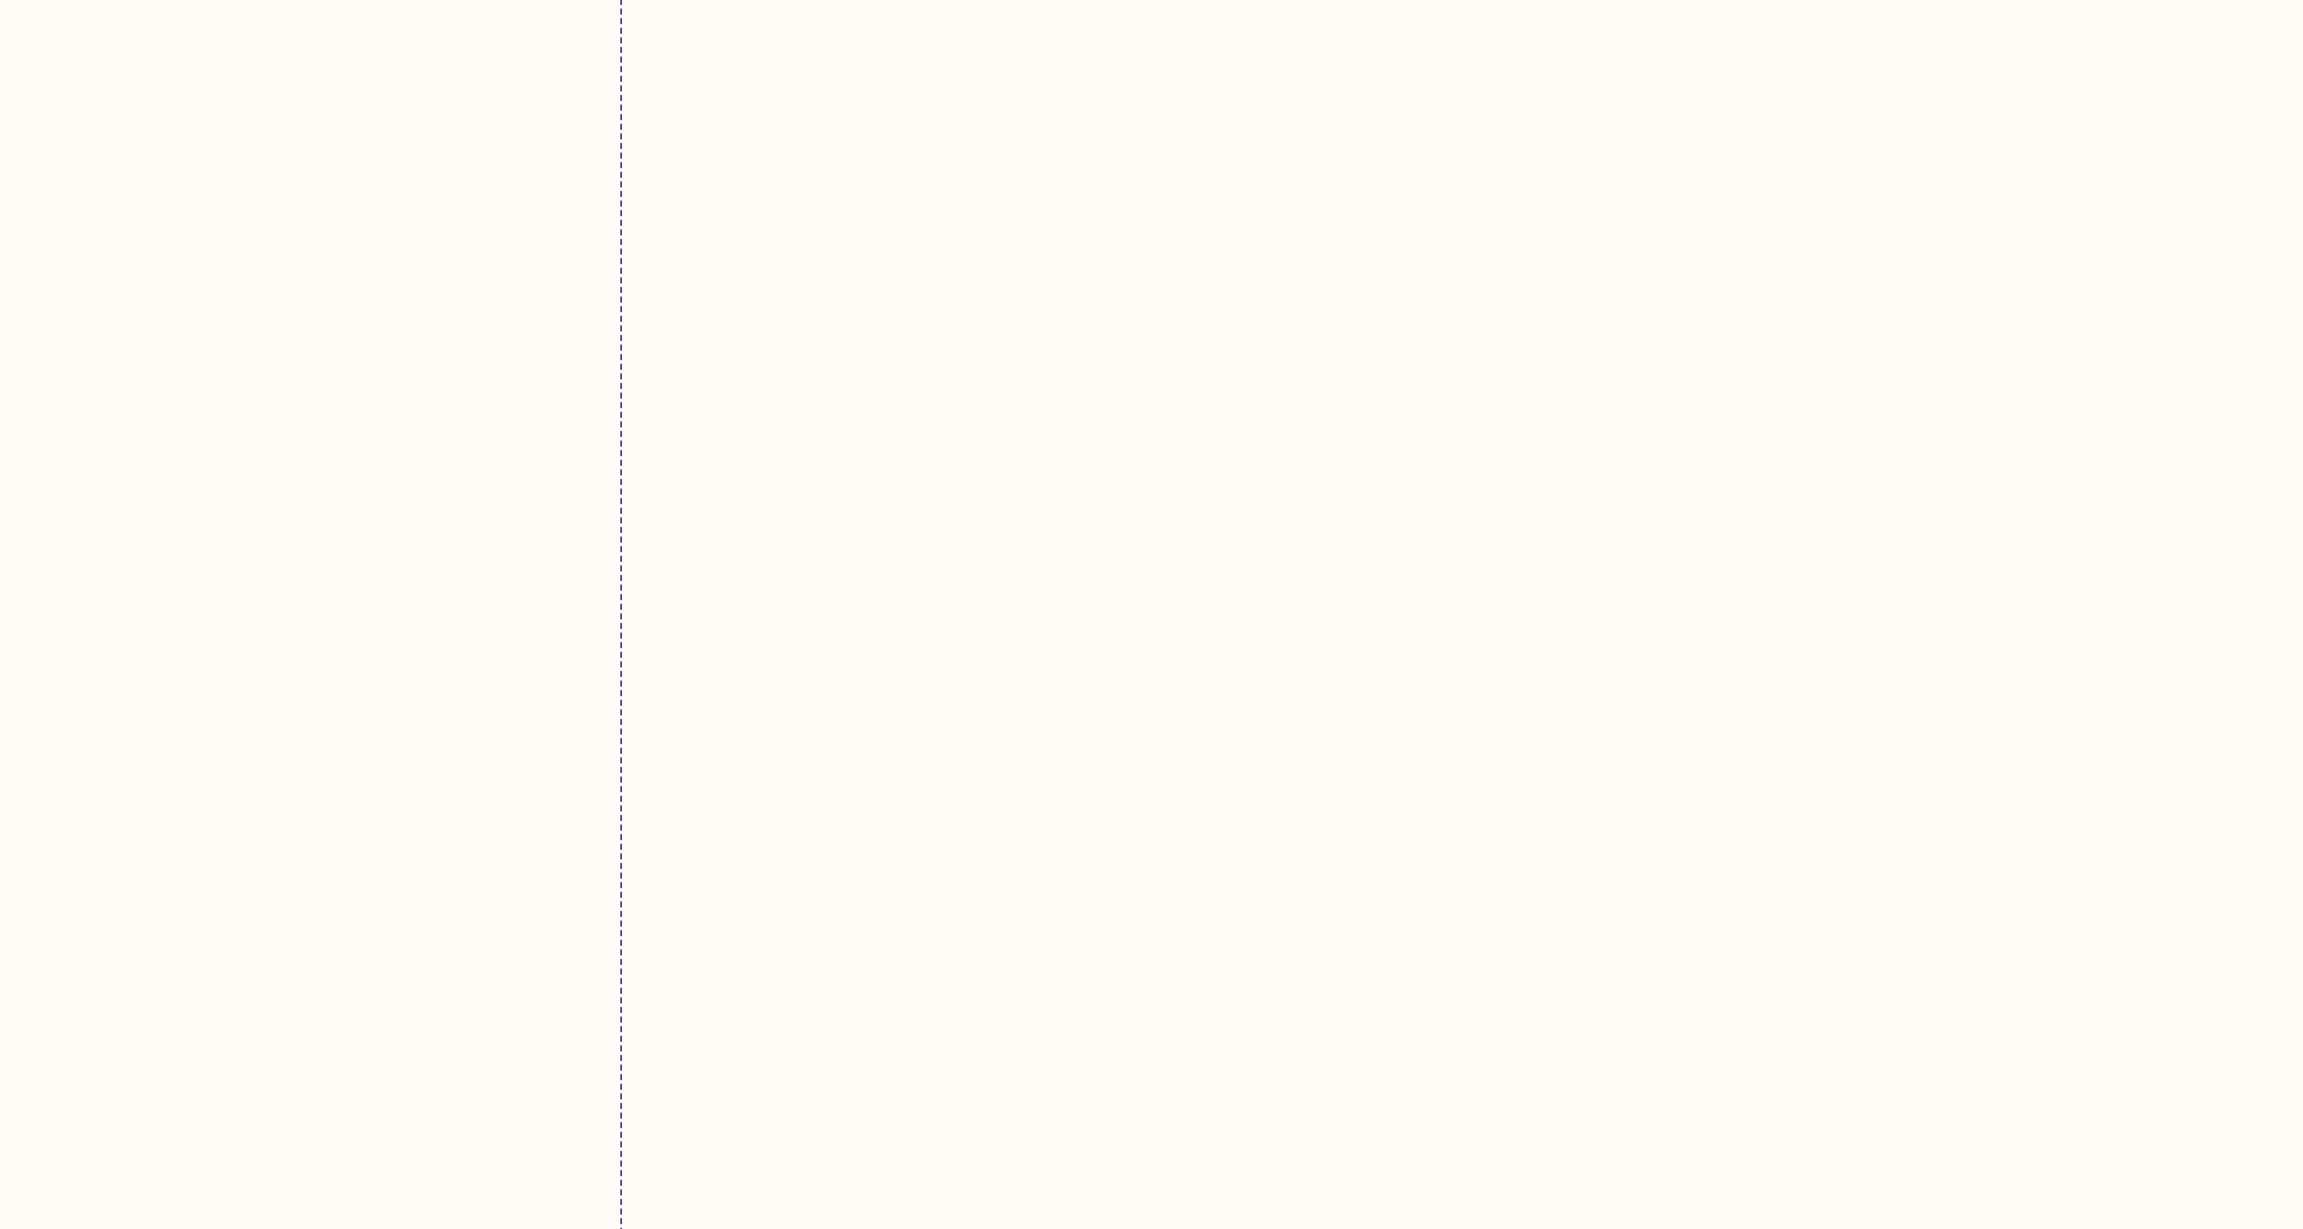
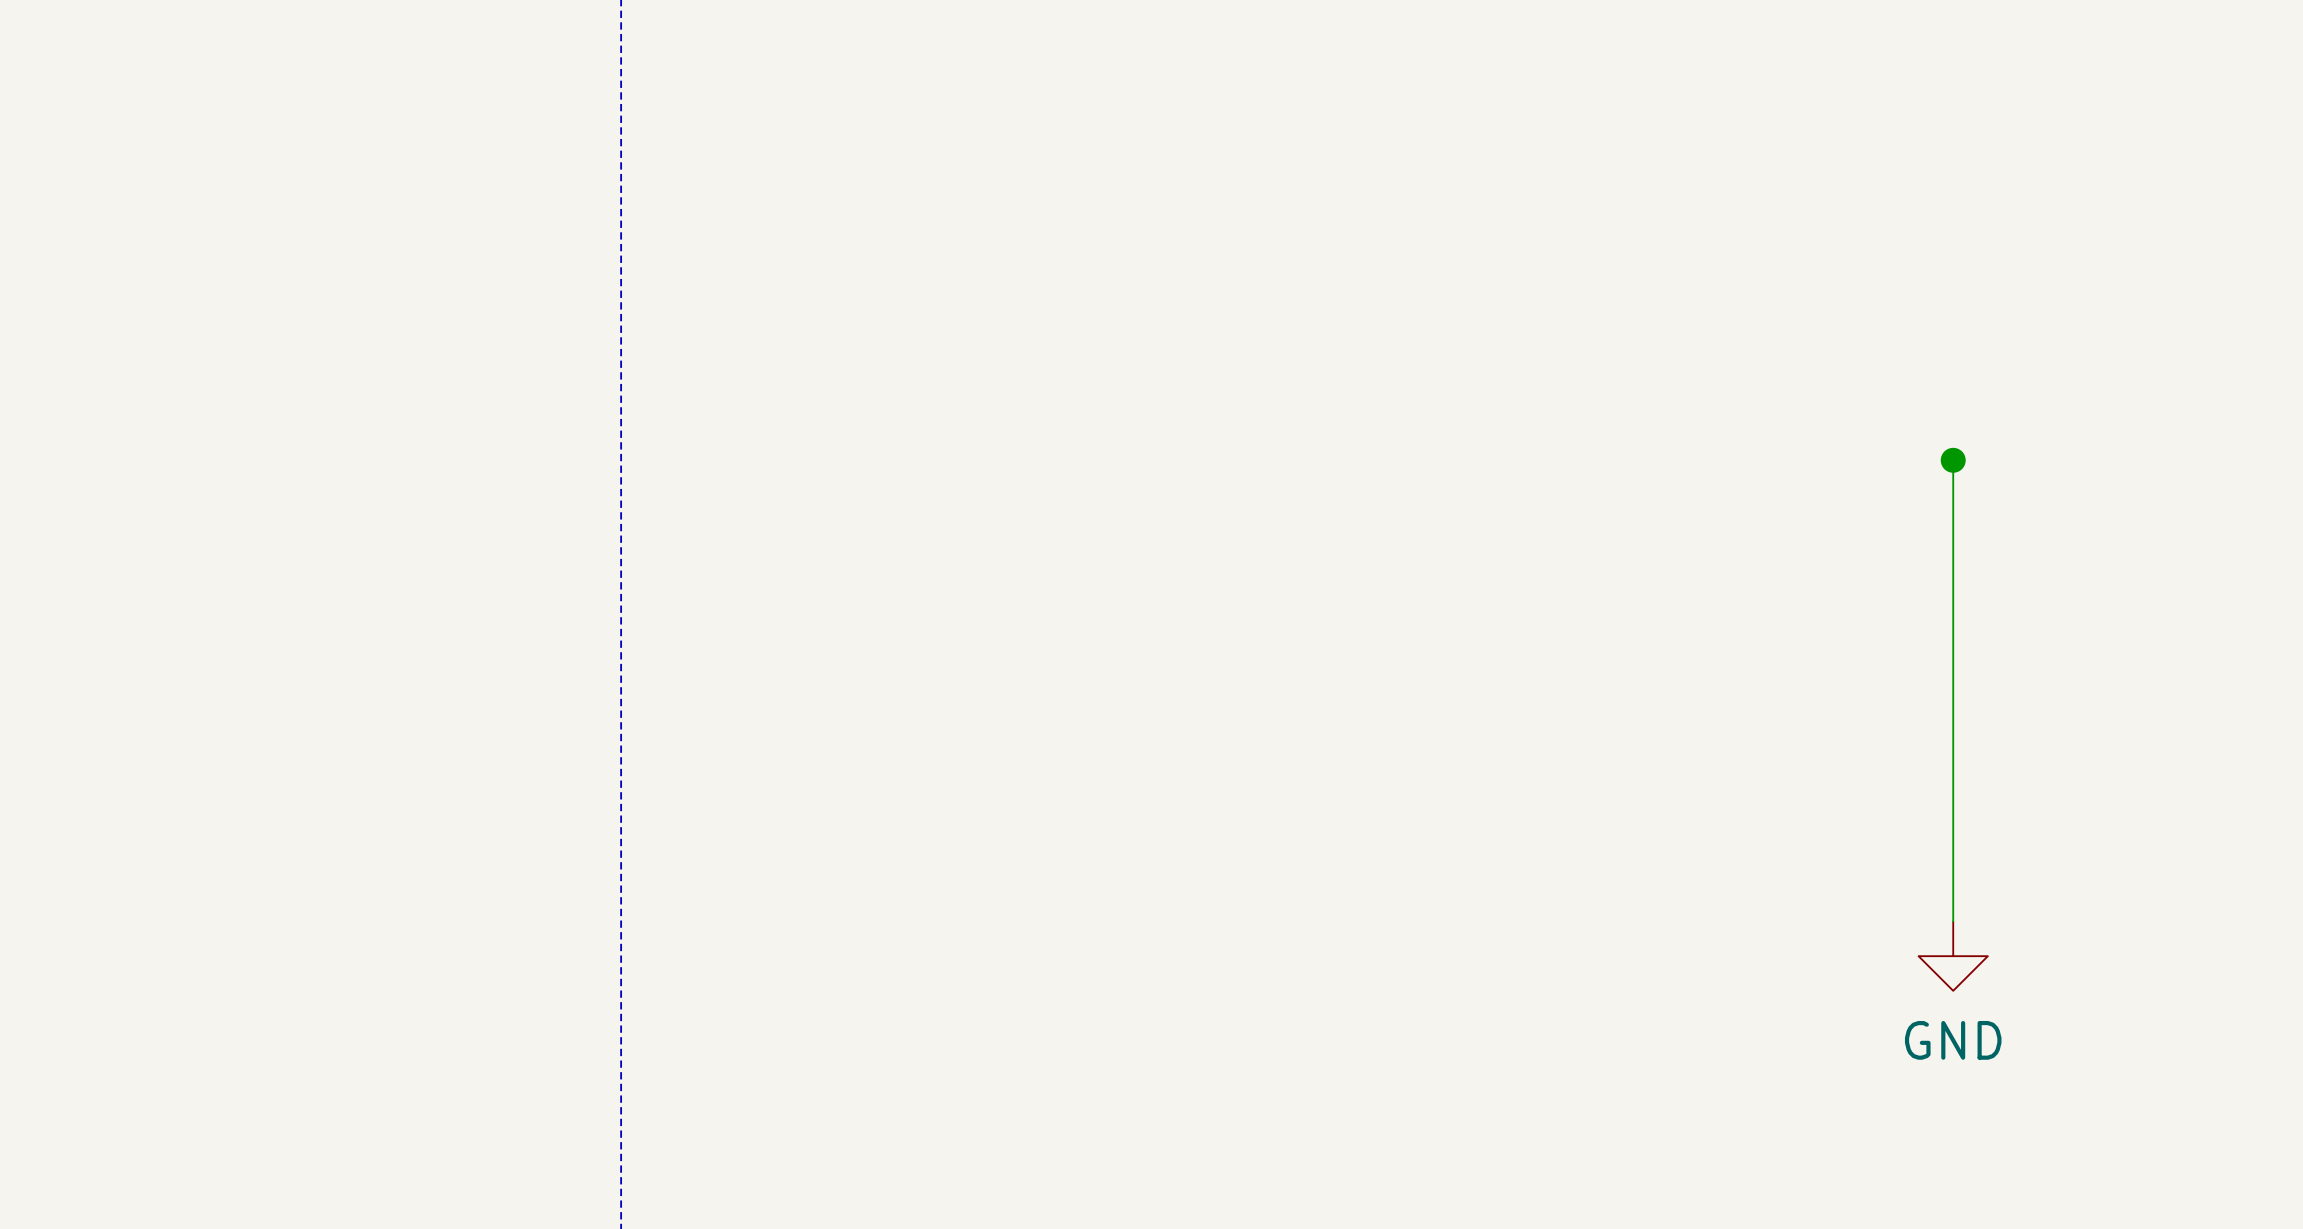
wire: none -> (1953, 460) (1953, 921)
junction: none -> (1953, 460)
power symbol: none -> GND (1953, 956)

